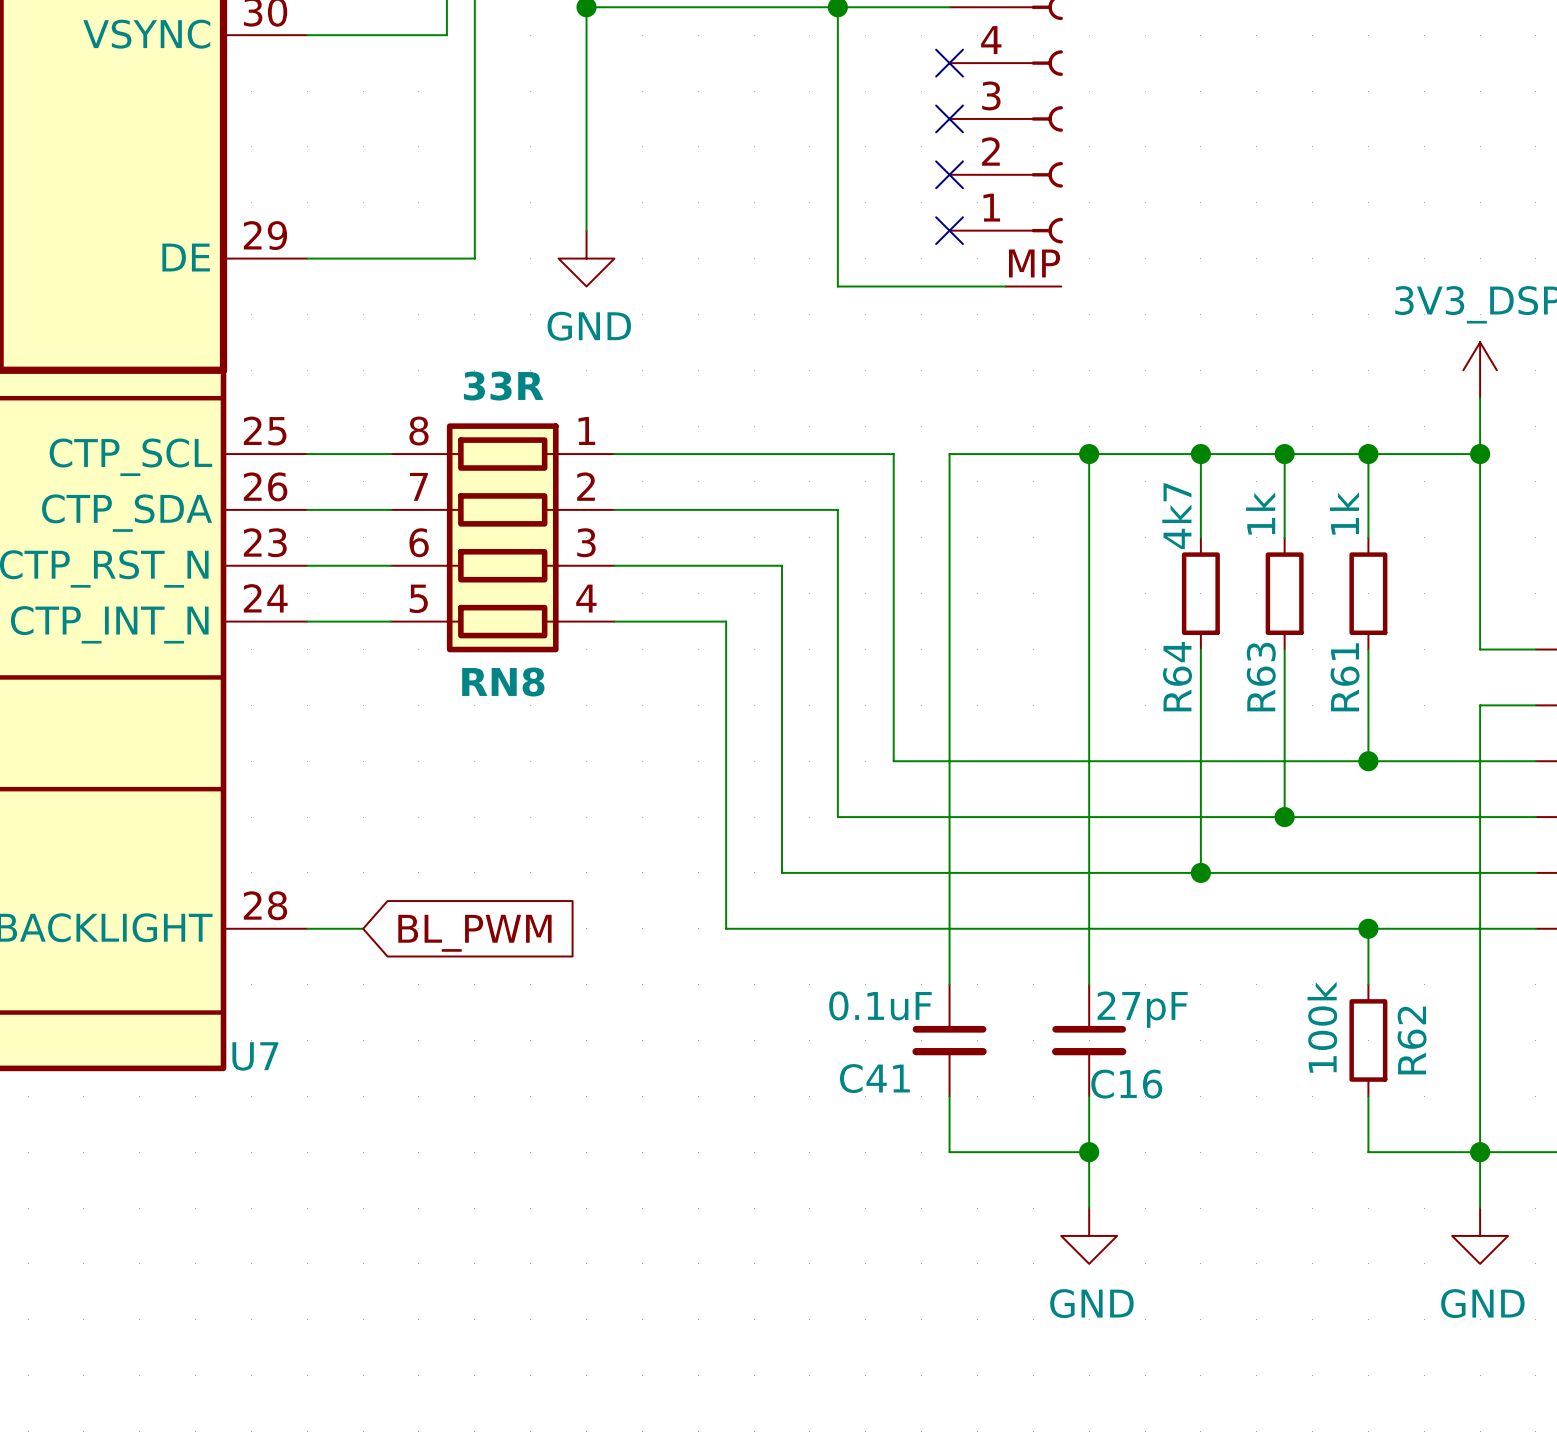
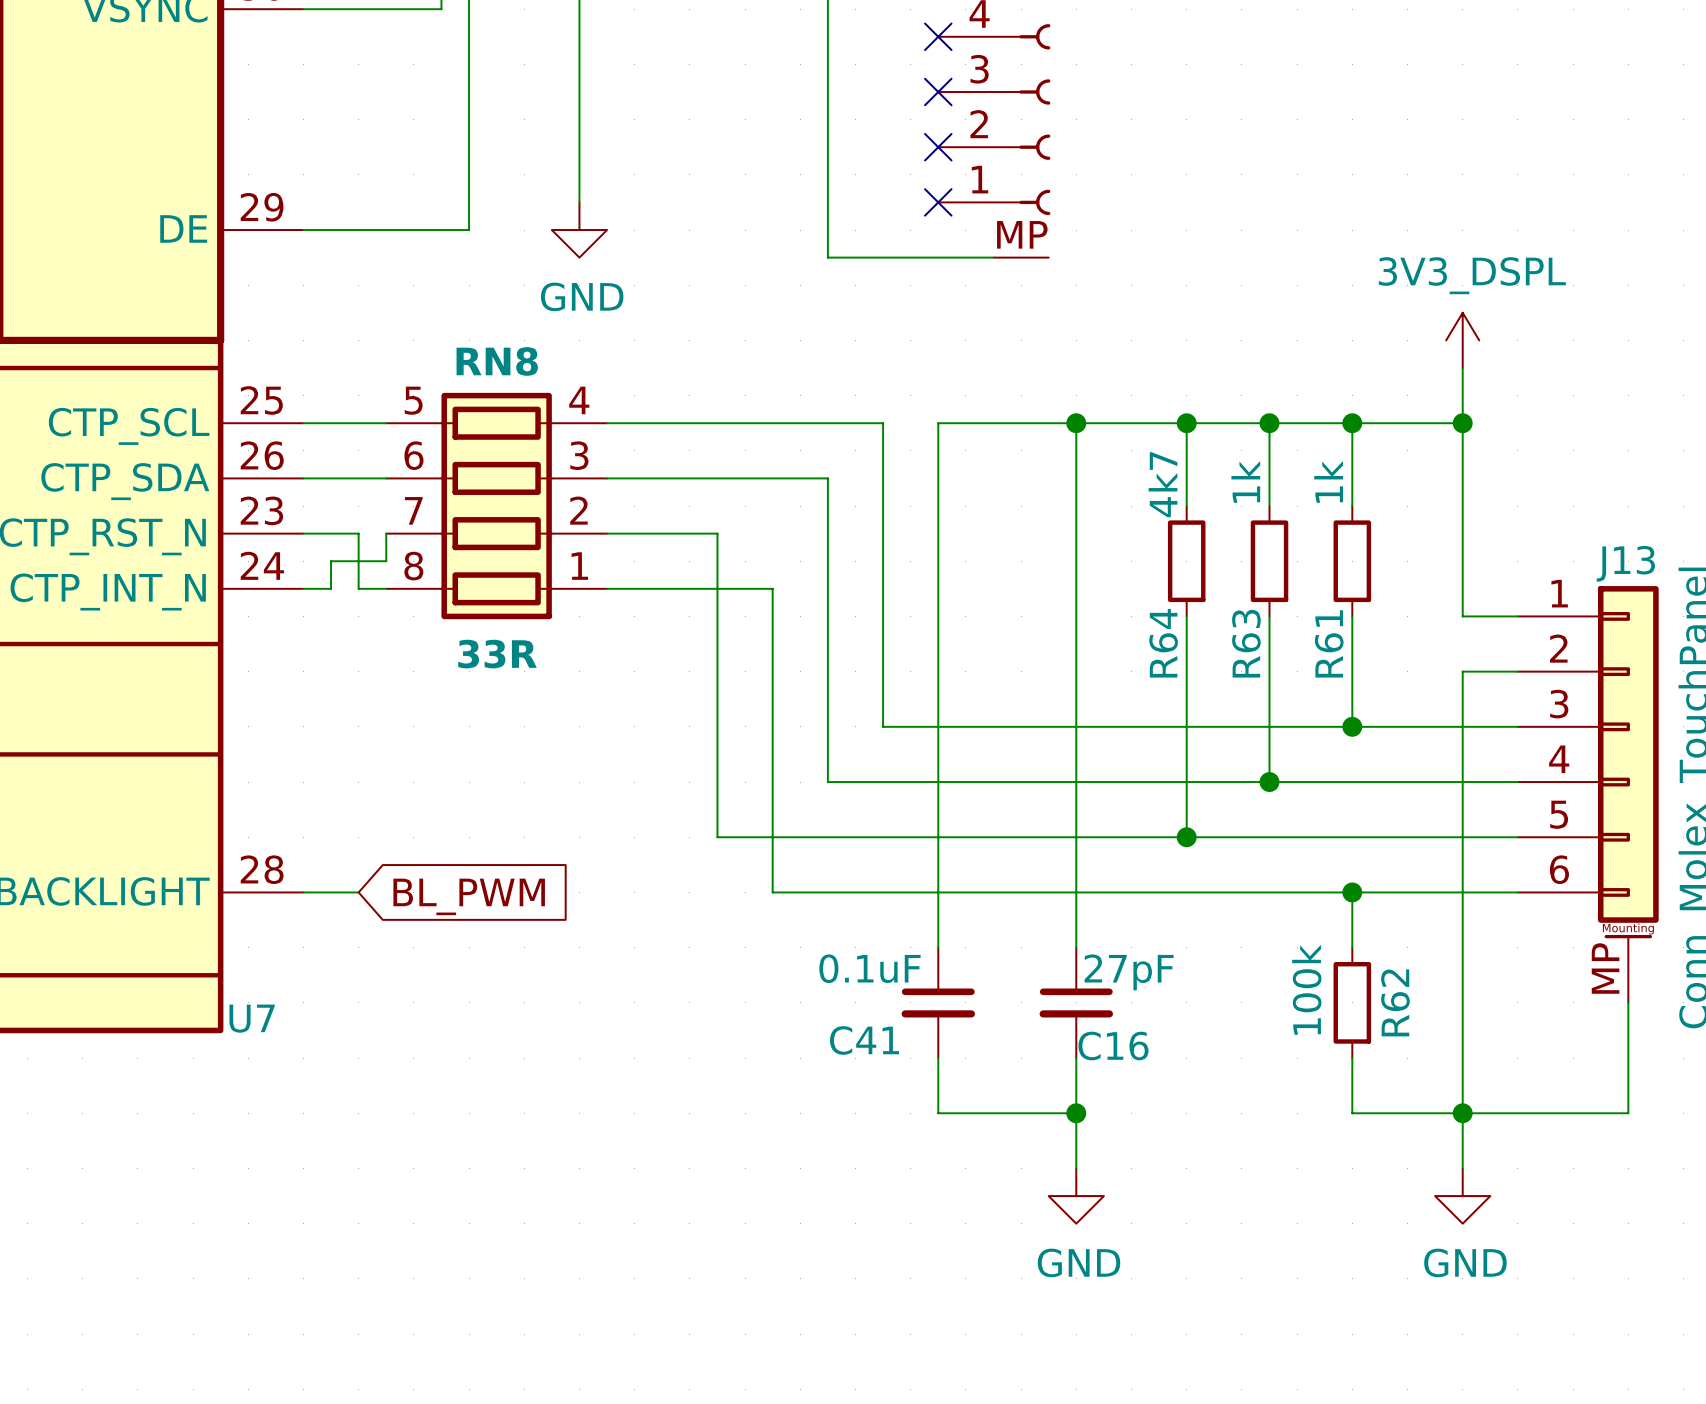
RN8 flip: as is (502, 537) -> up-down (496, 506)
wire: (363, 565) (391, 565) -> (331, 588) (331, 561) (386, 561) (386, 533)
wire: (726, 565) (782, 565) (782, 621) -> (717, 533) (717, 588) (772, 588)
wire: (335, 621) (363, 621) -> (358, 533) (358, 588)
wire: (726, 872) (726, 928) (782, 928) -> (717, 837) (772, 837) (772, 892)

